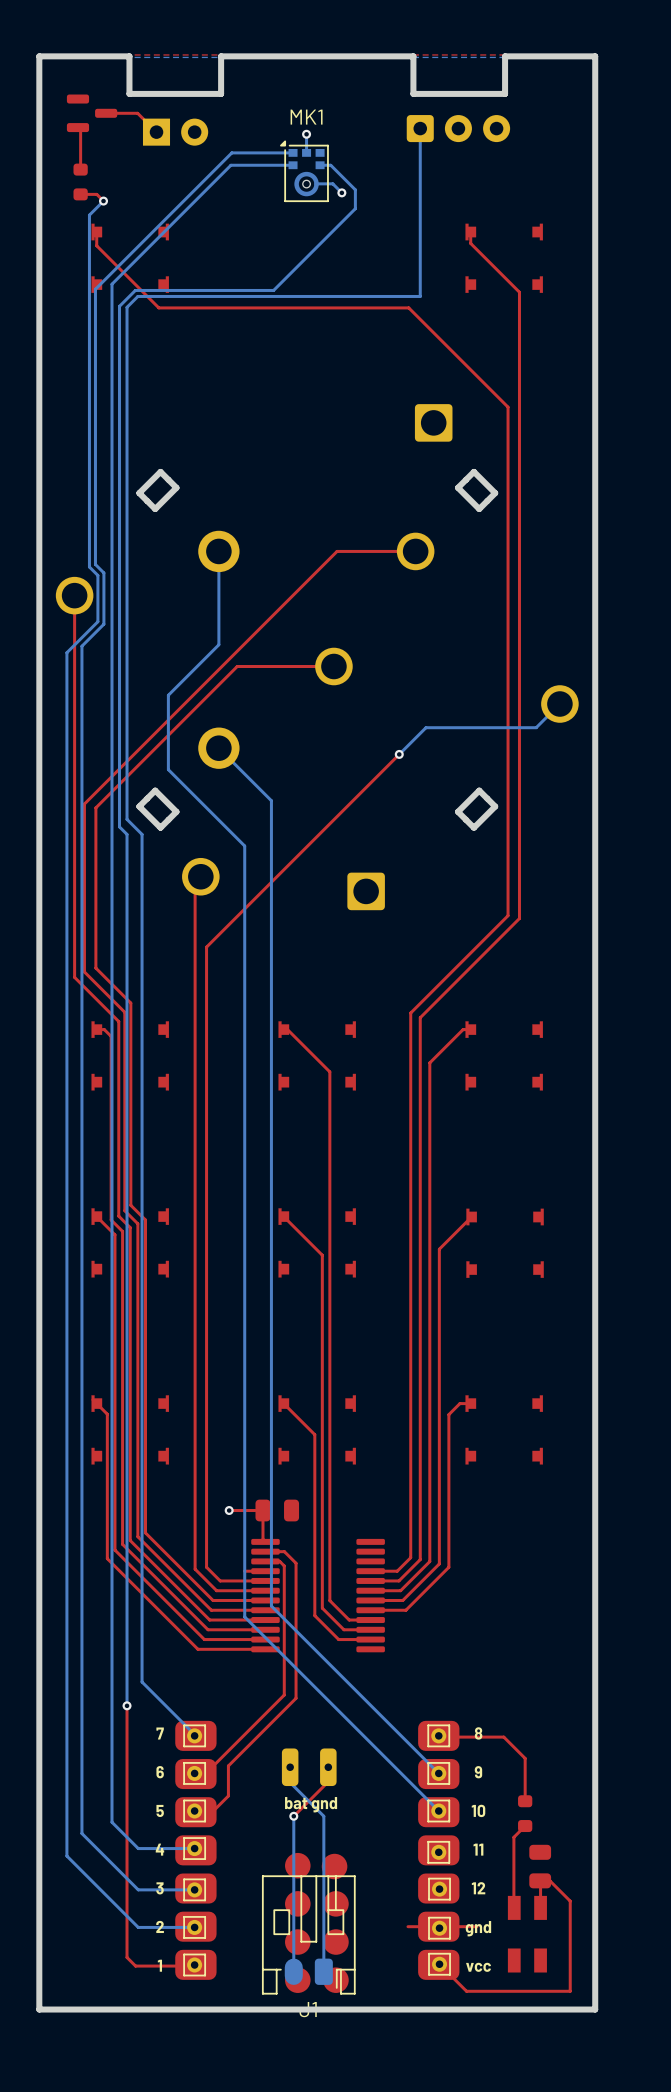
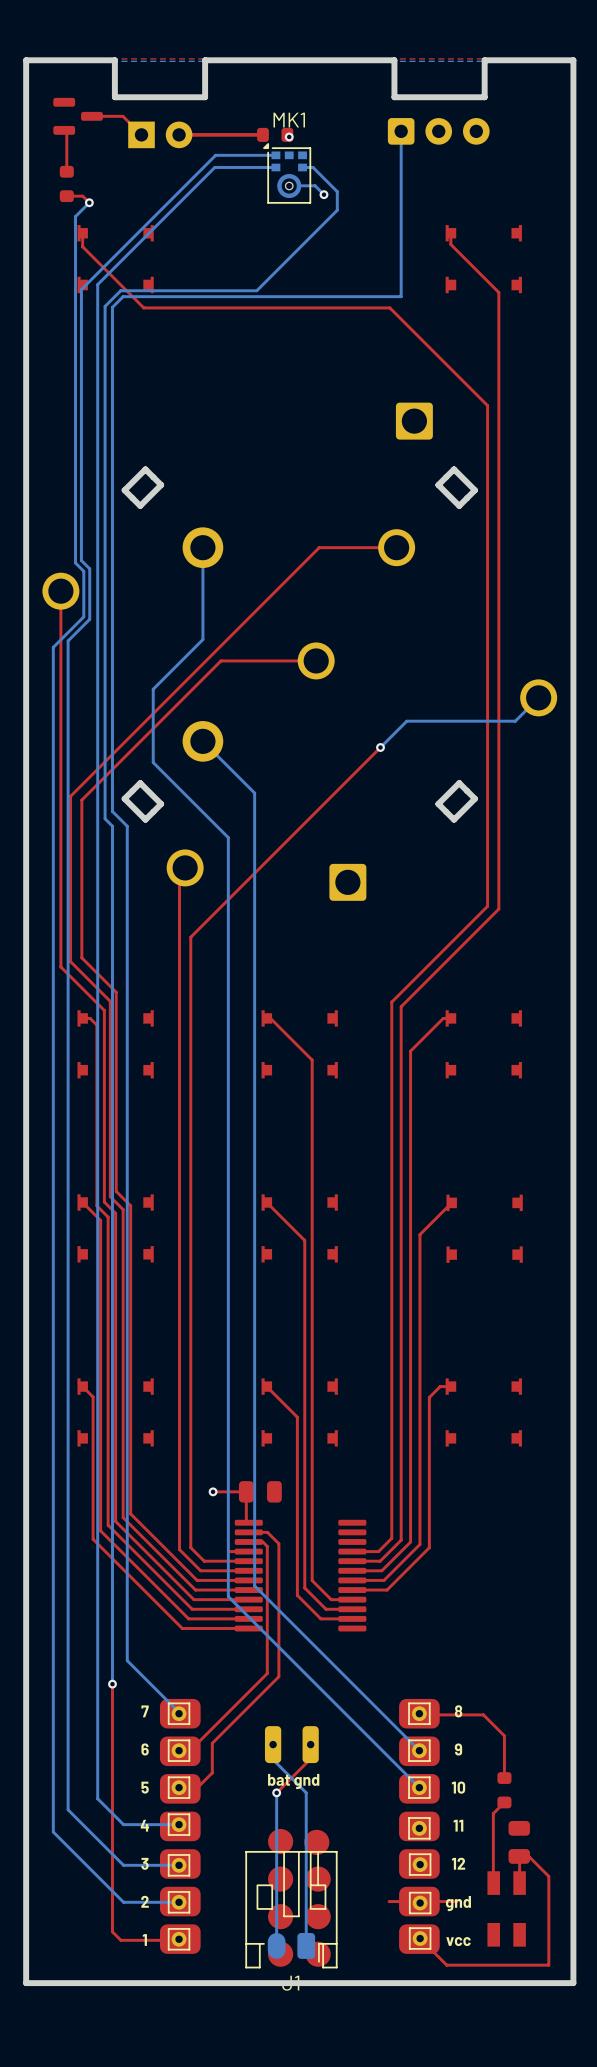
top track: none -> (262, 134) (179, 134)
part: none -> (275, 134)
bottom track: (306, 134) (306, 152) -> none

